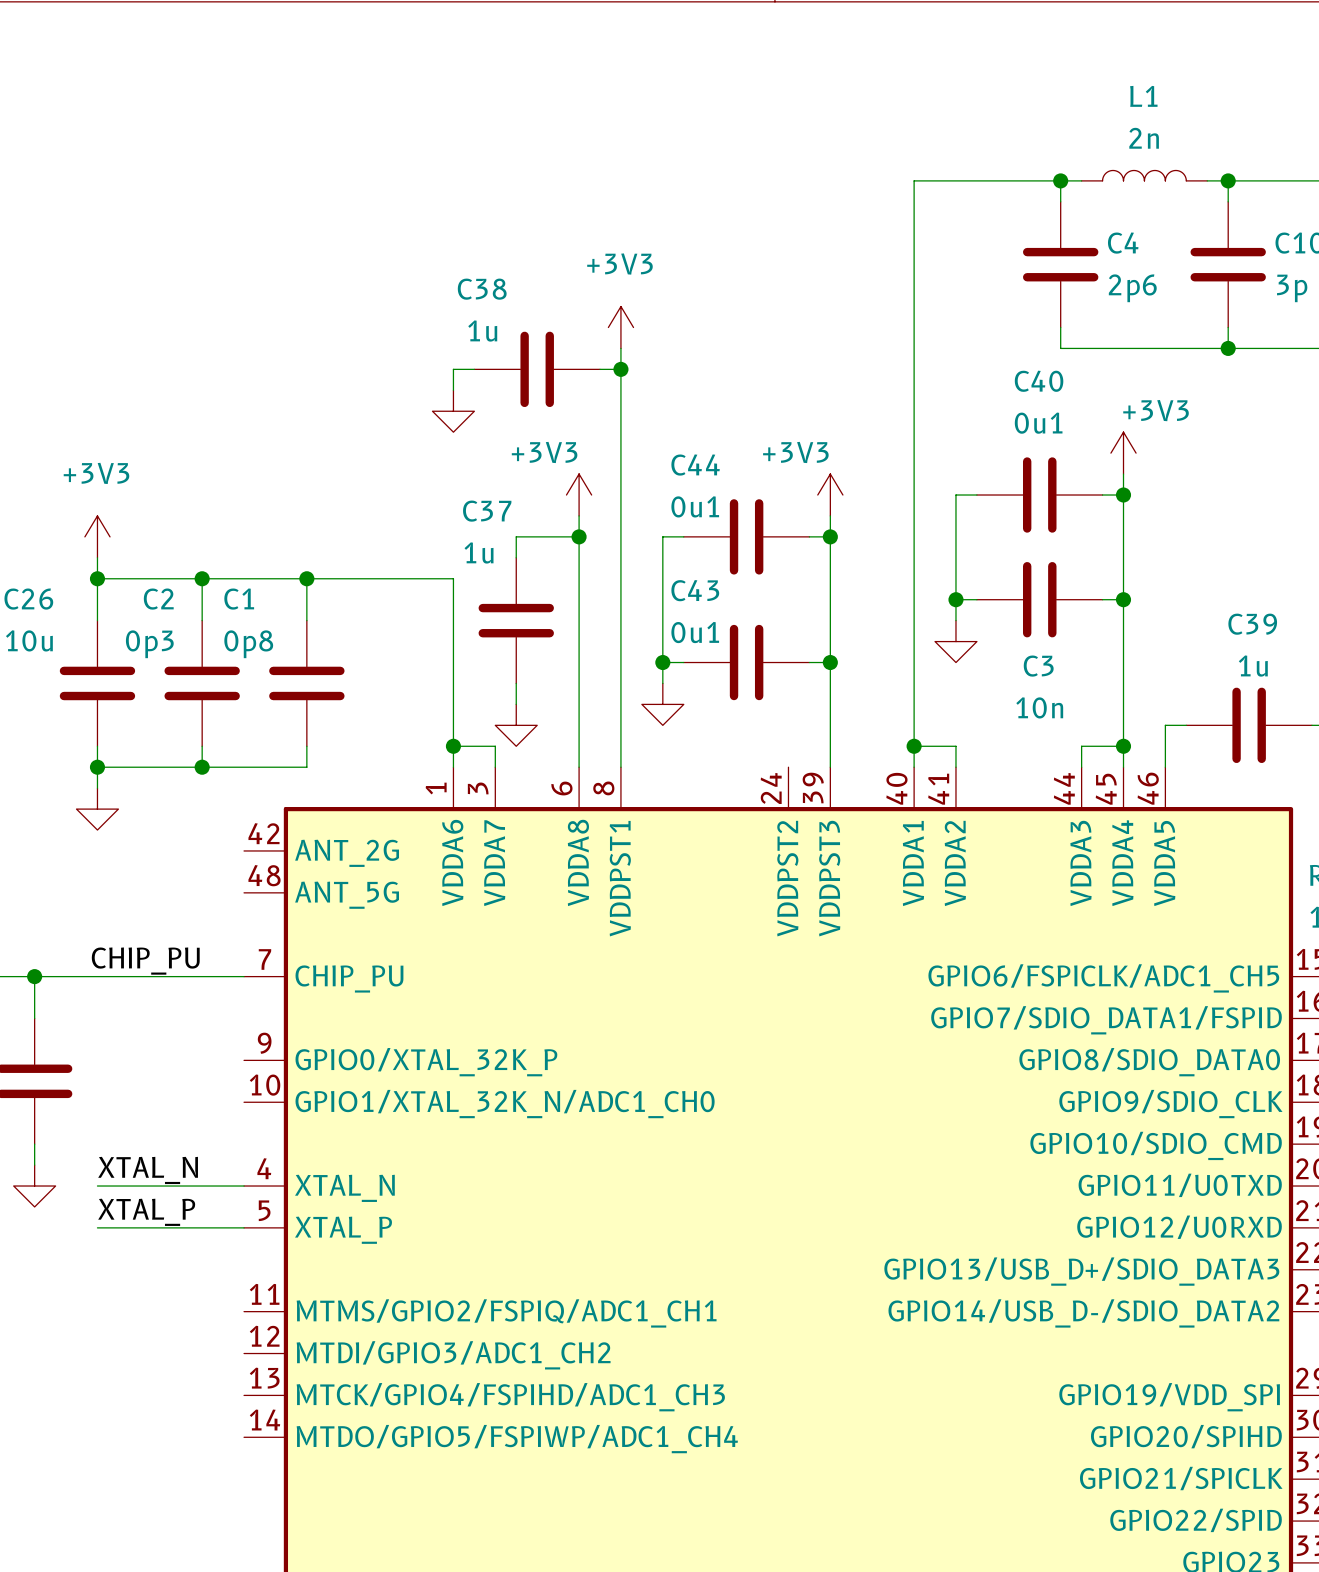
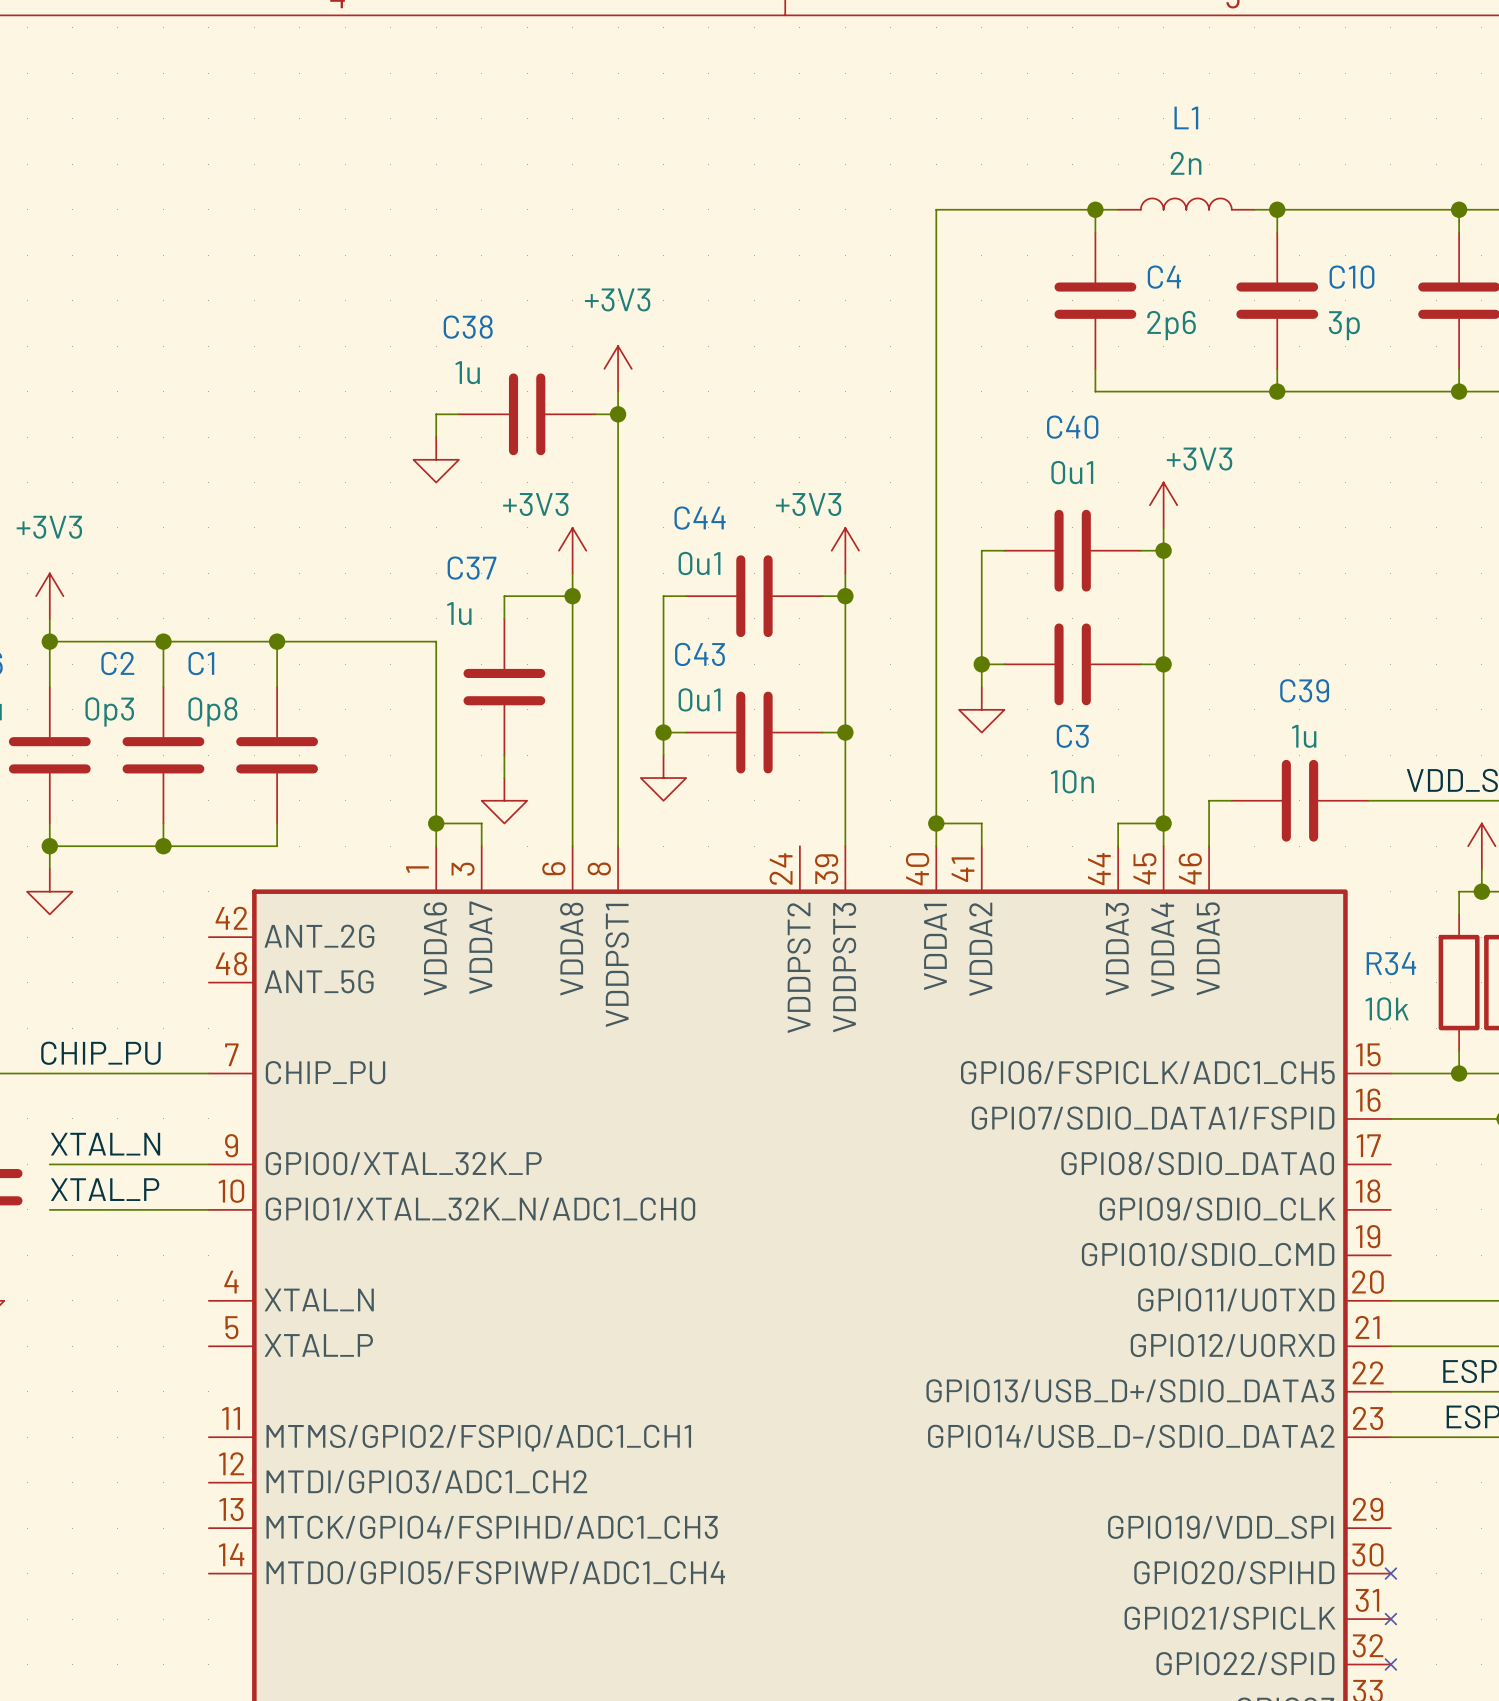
label position: XTAL_N (148, 1170) -> XTAL_N (105, 1144)
wire: (97, 1186) (244, 1186) -> (49, 1209) (208, 1209)
label position: XTAL_P (146, 1212) -> XTAL_P (105, 1189)
wire: (97, 1227) (244, 1227) -> (49, 1164) (208, 1164)

